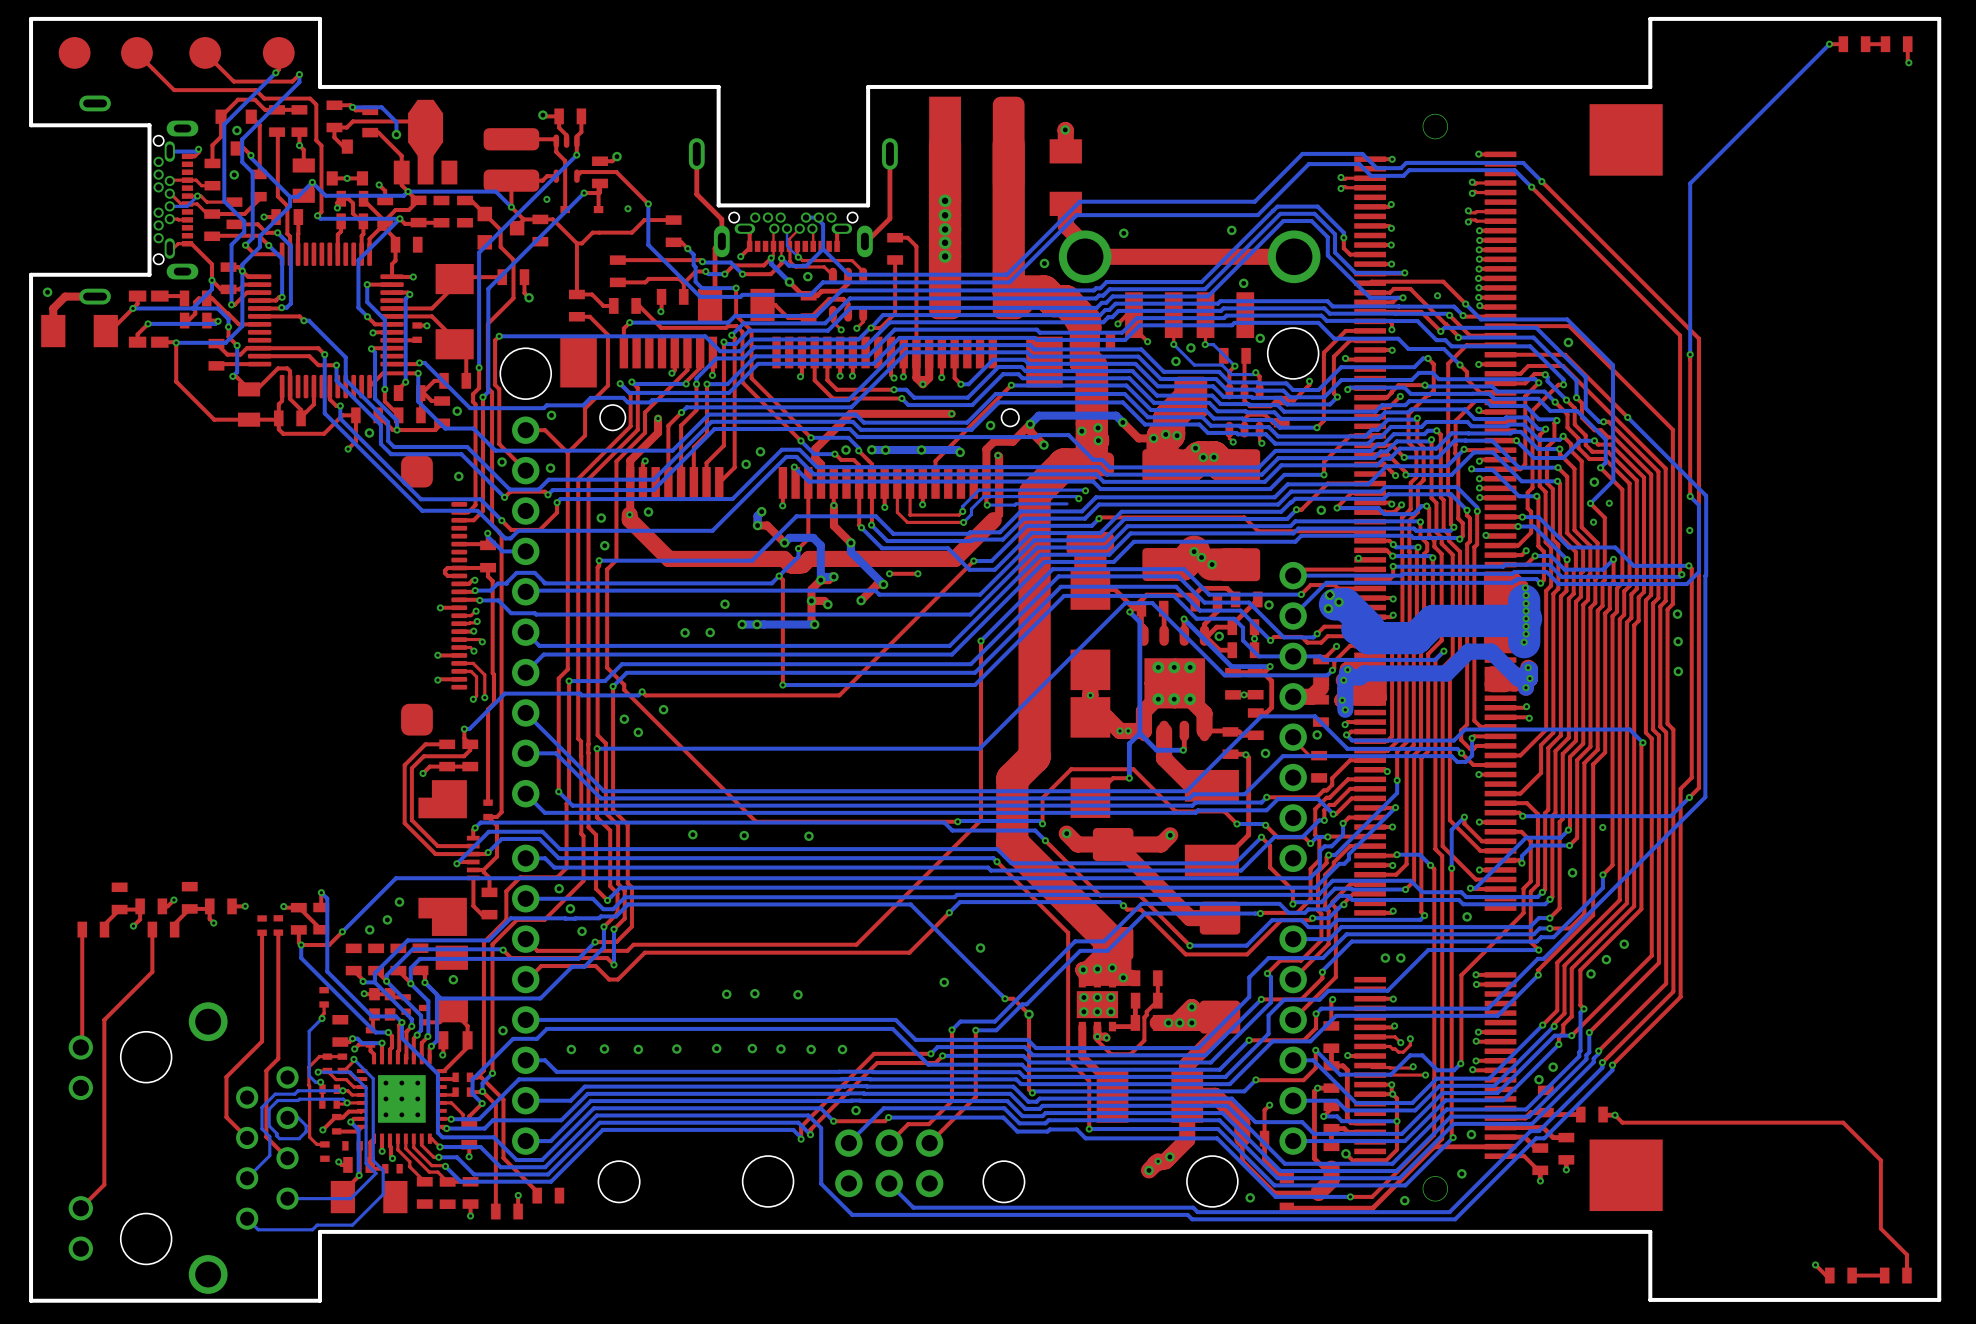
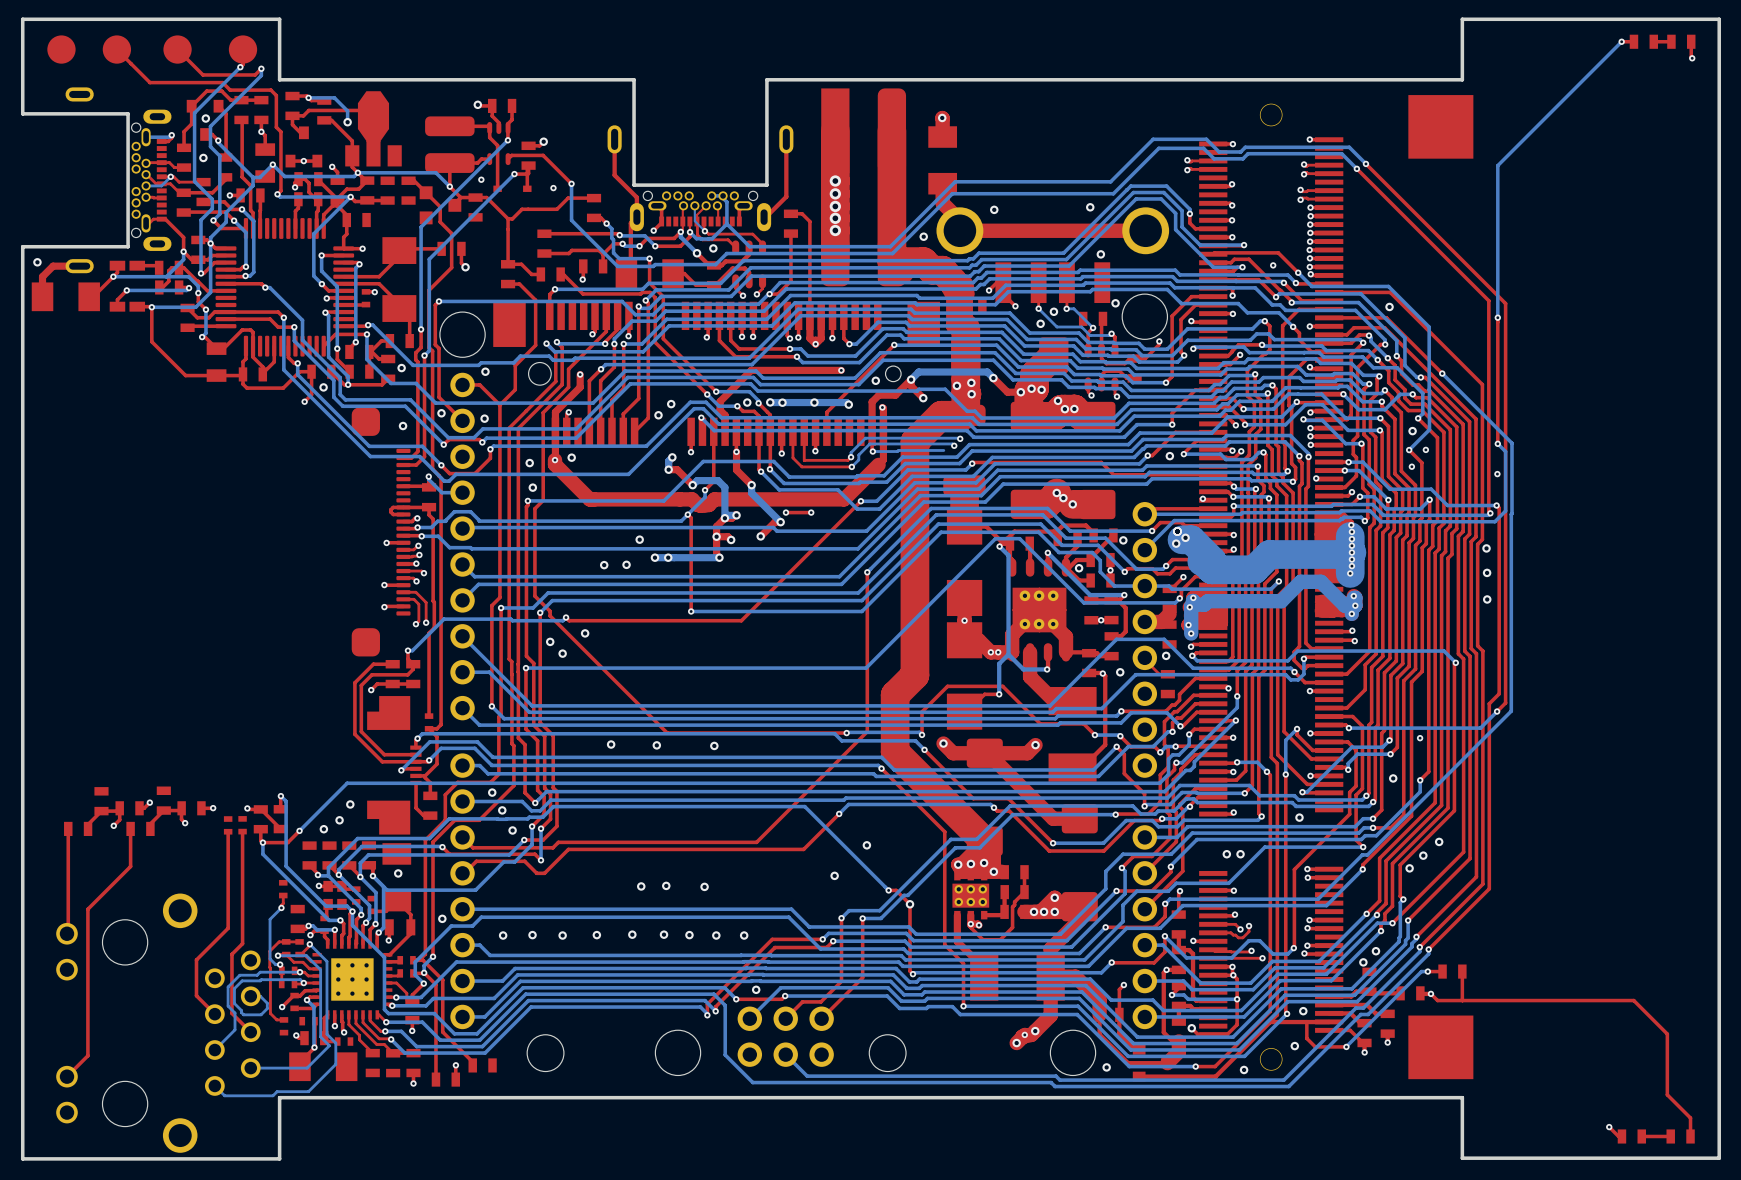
bottom track: none -> (1427, 971) (1421, 971) (1346, 1046)
via: none -> (1427, 971)
top track: none -> (1442, 971) (1427, 971)
part: none -> (1452, 971)
top track: none -> (1462, 971) (1462, 1000)
top track: none -> (1306, 1022) (1306, 1038) (1315, 1046) (1346, 1046)
via: none -> (1346, 1046)

